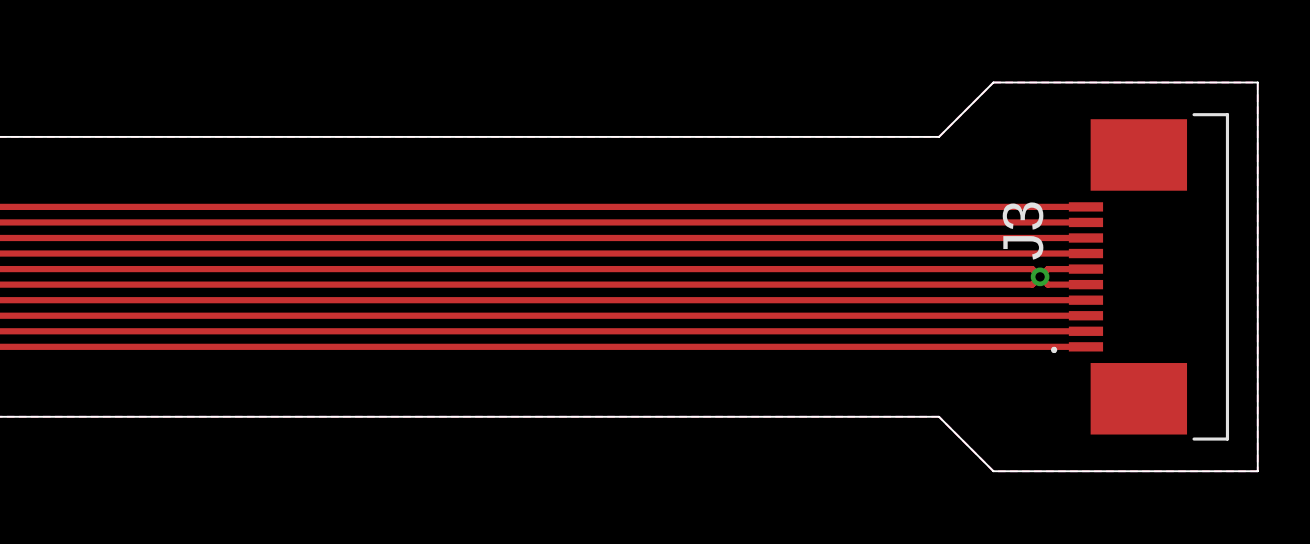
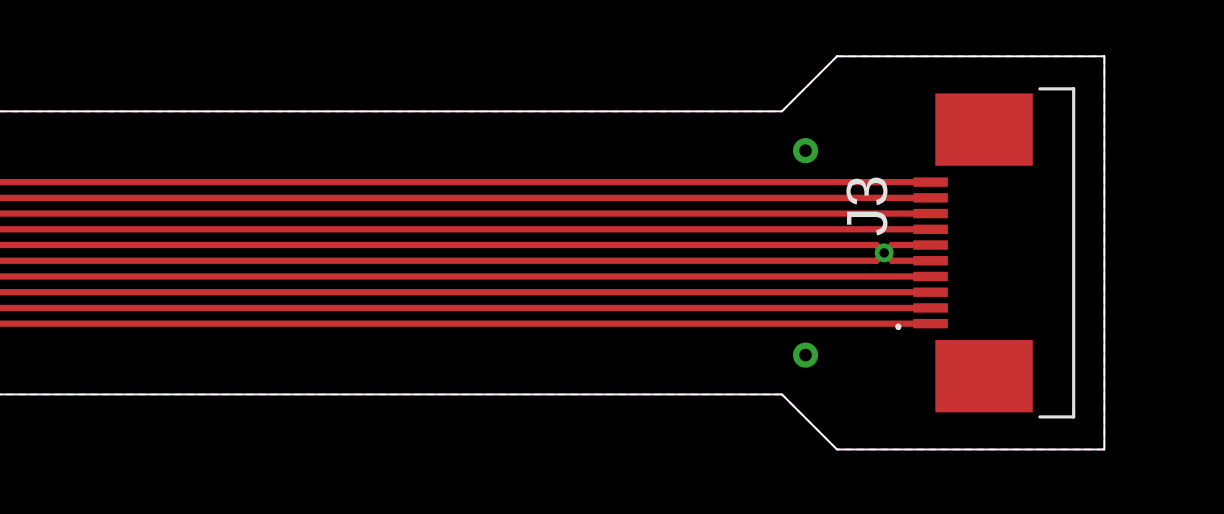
via: none -> (805, 150)
via: none -> (805, 355)

